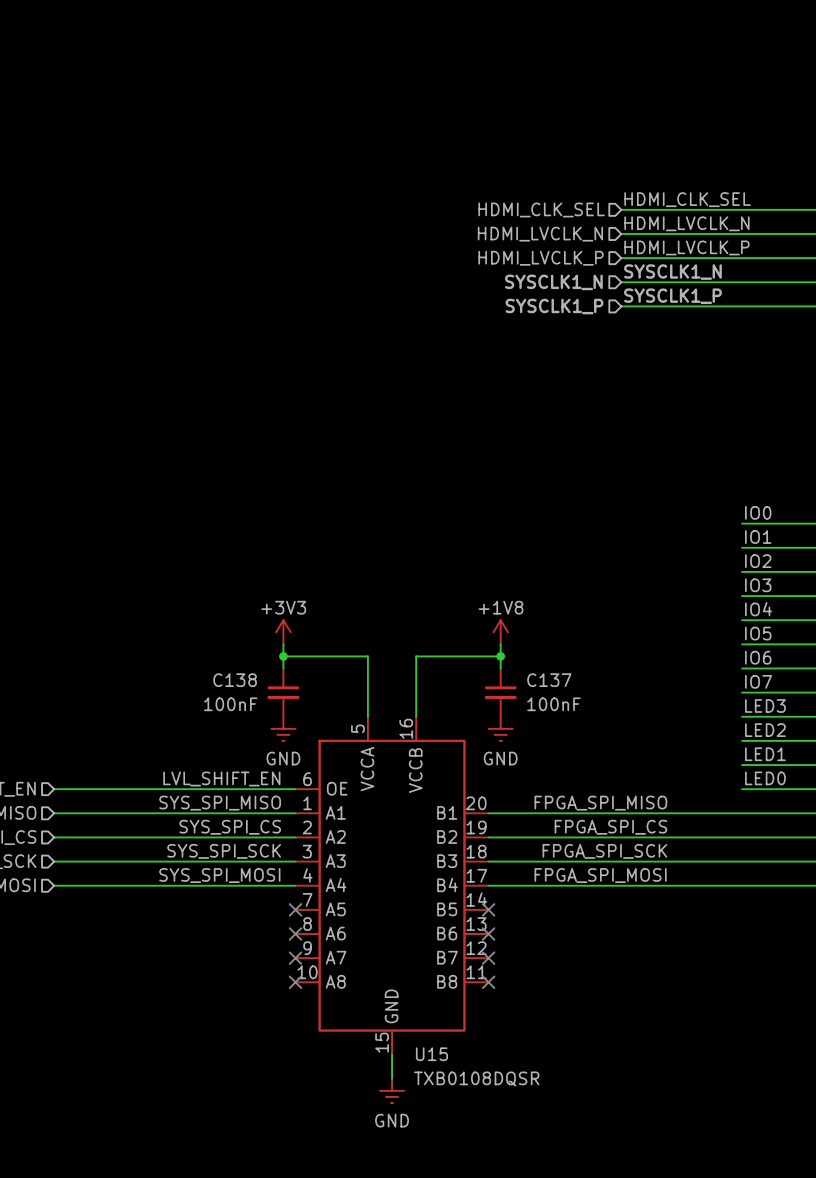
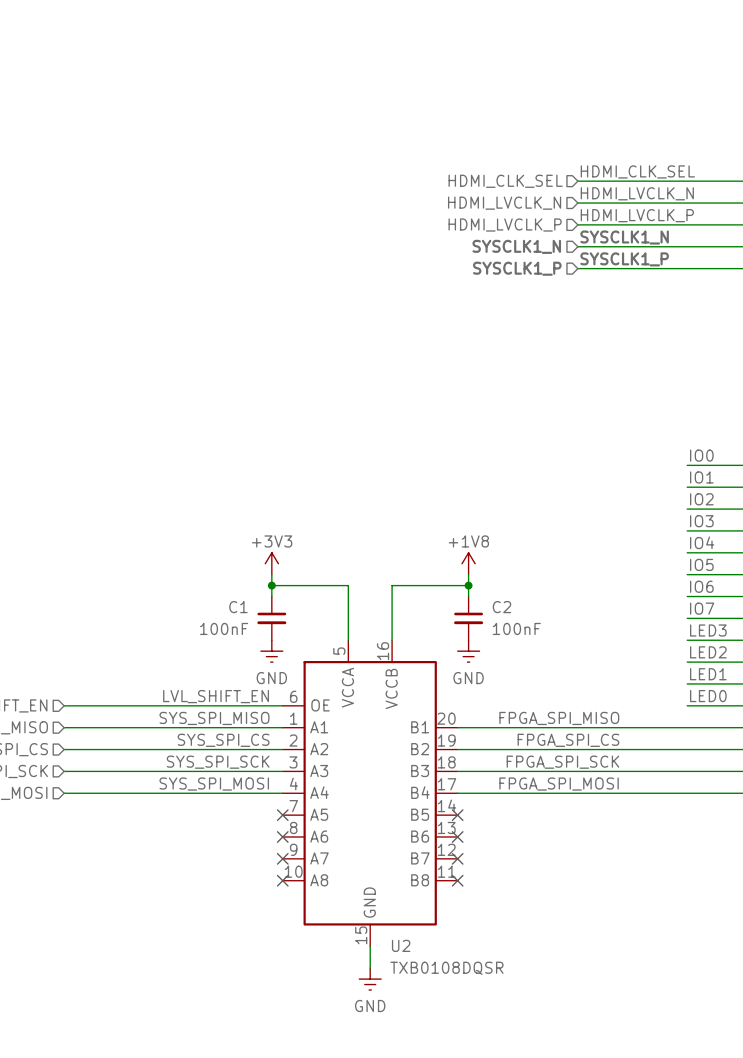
C138 name: C138 (235, 680) -> C1 (238, 607)
C137 name: C137 (549, 680) -> C2 (501, 607)
U15 name: U15 (431, 1054) -> U2 (401, 945)

